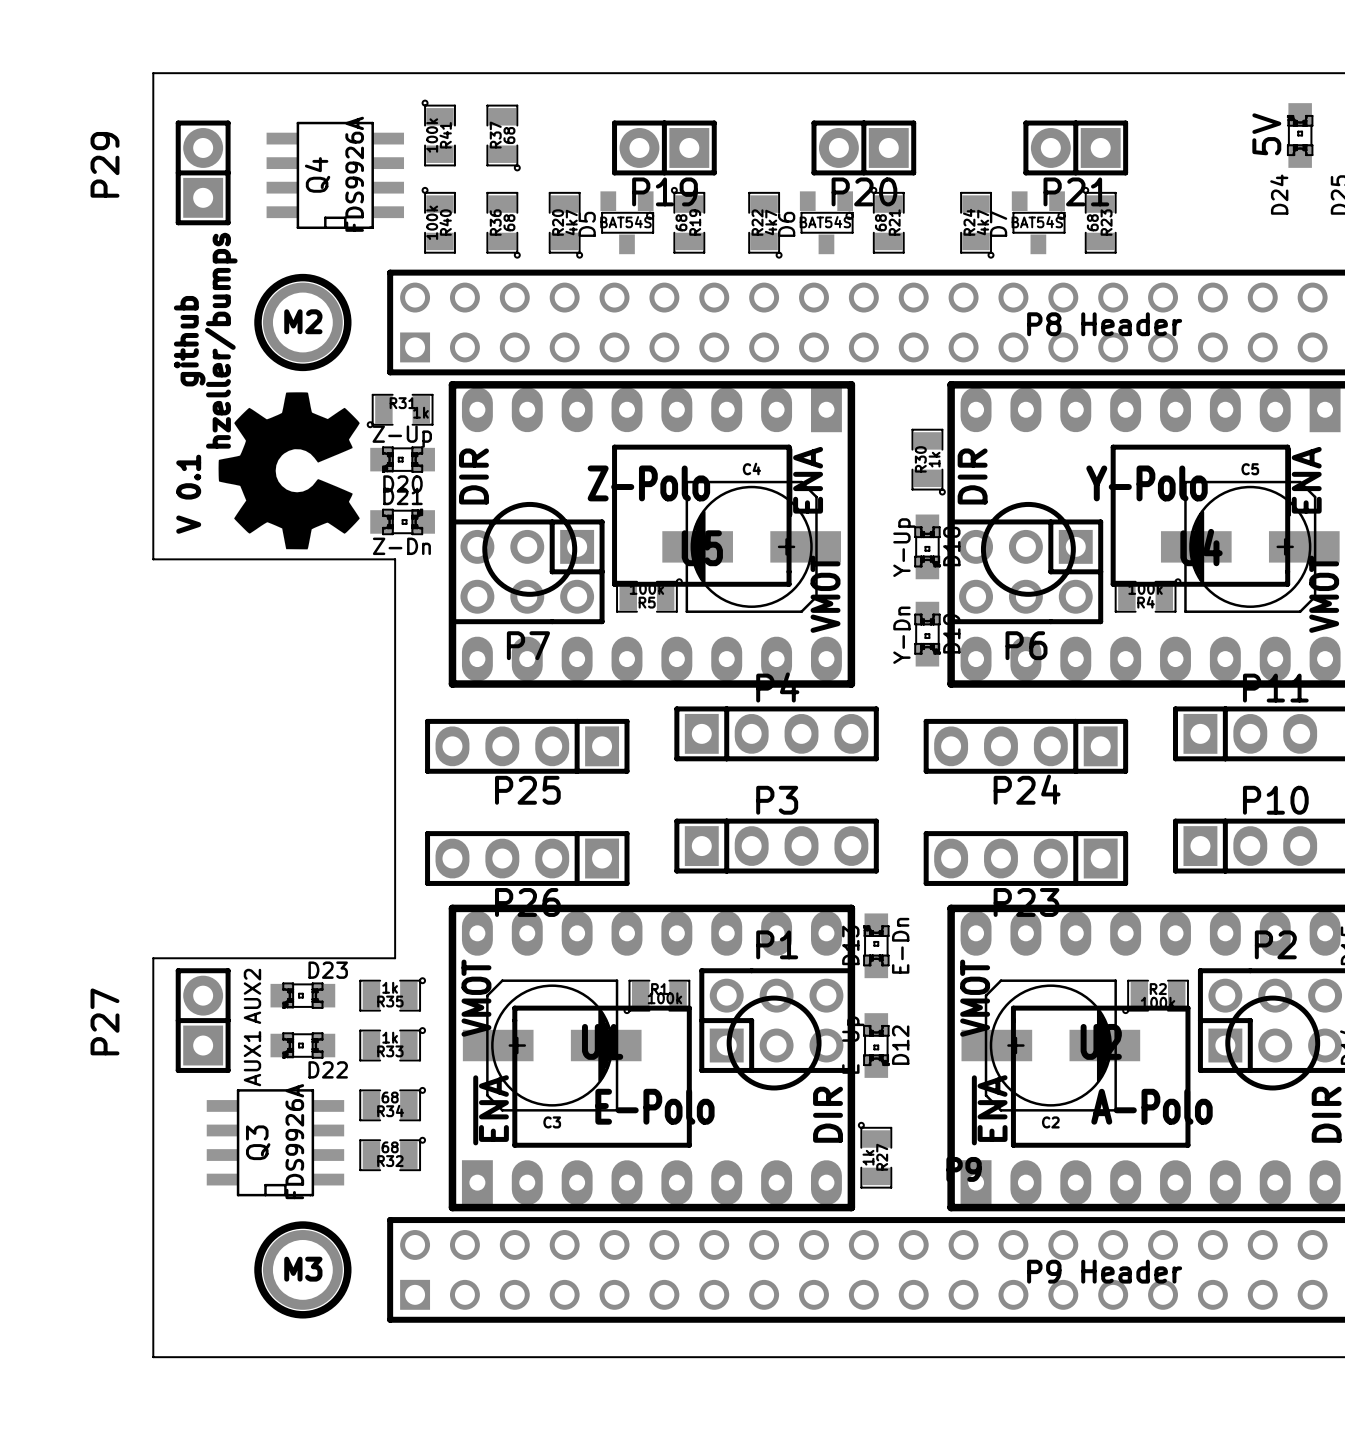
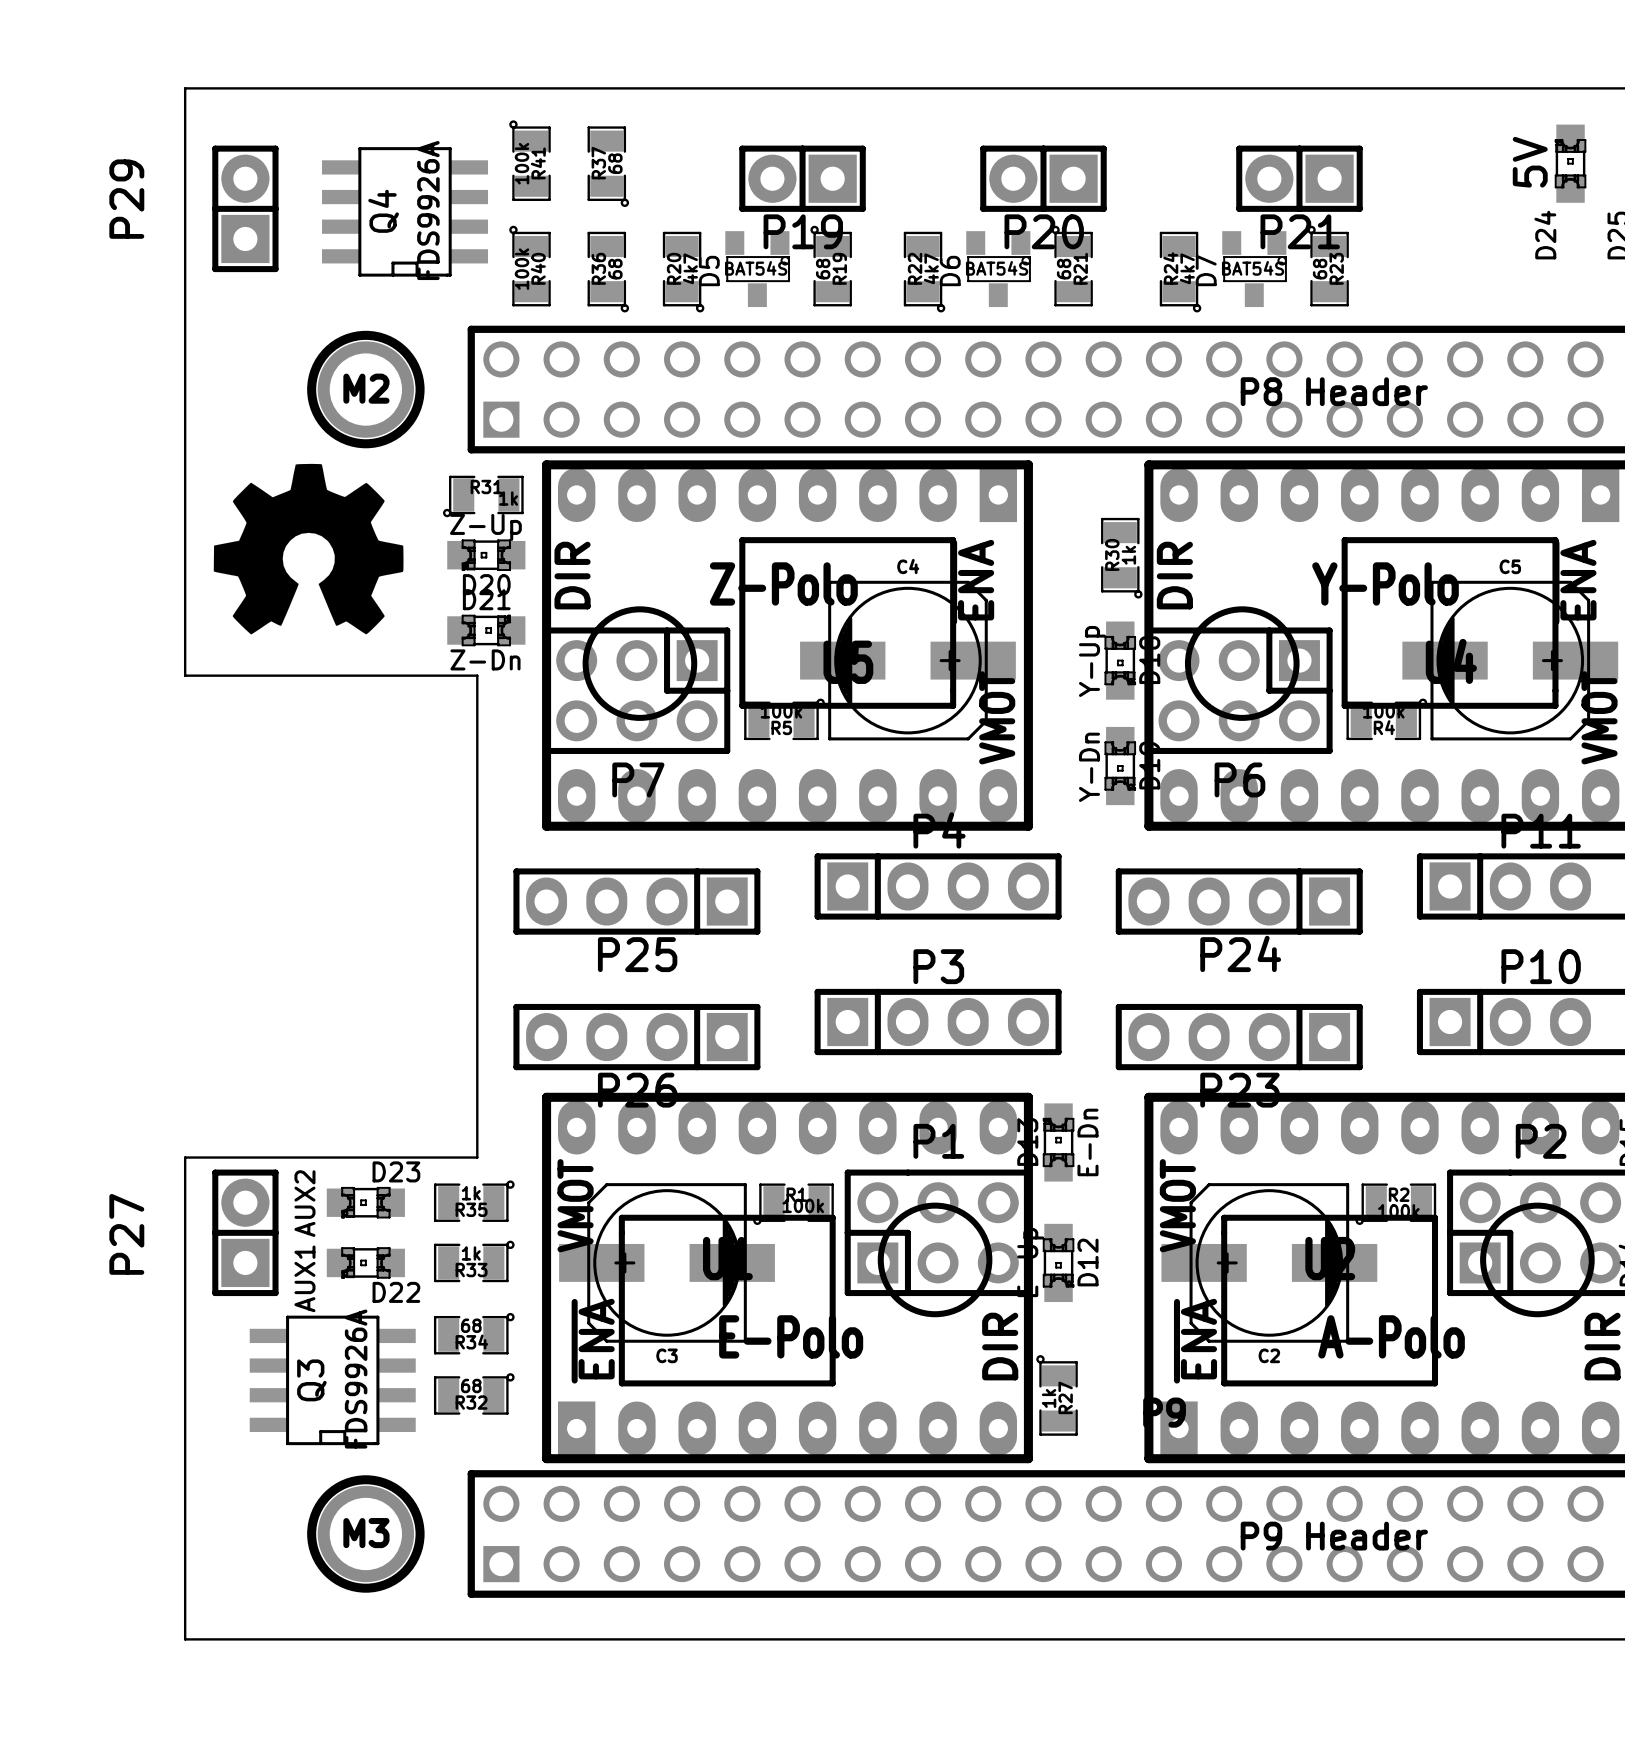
text: hzeller/bumps (221, 340) -> none
text: github (189, 341) -> none
drawing: none -> [213, 463, 404, 635]
drawing: [218, 392, 360, 550] -> none
text: V 0.1 (188, 494) -> none

